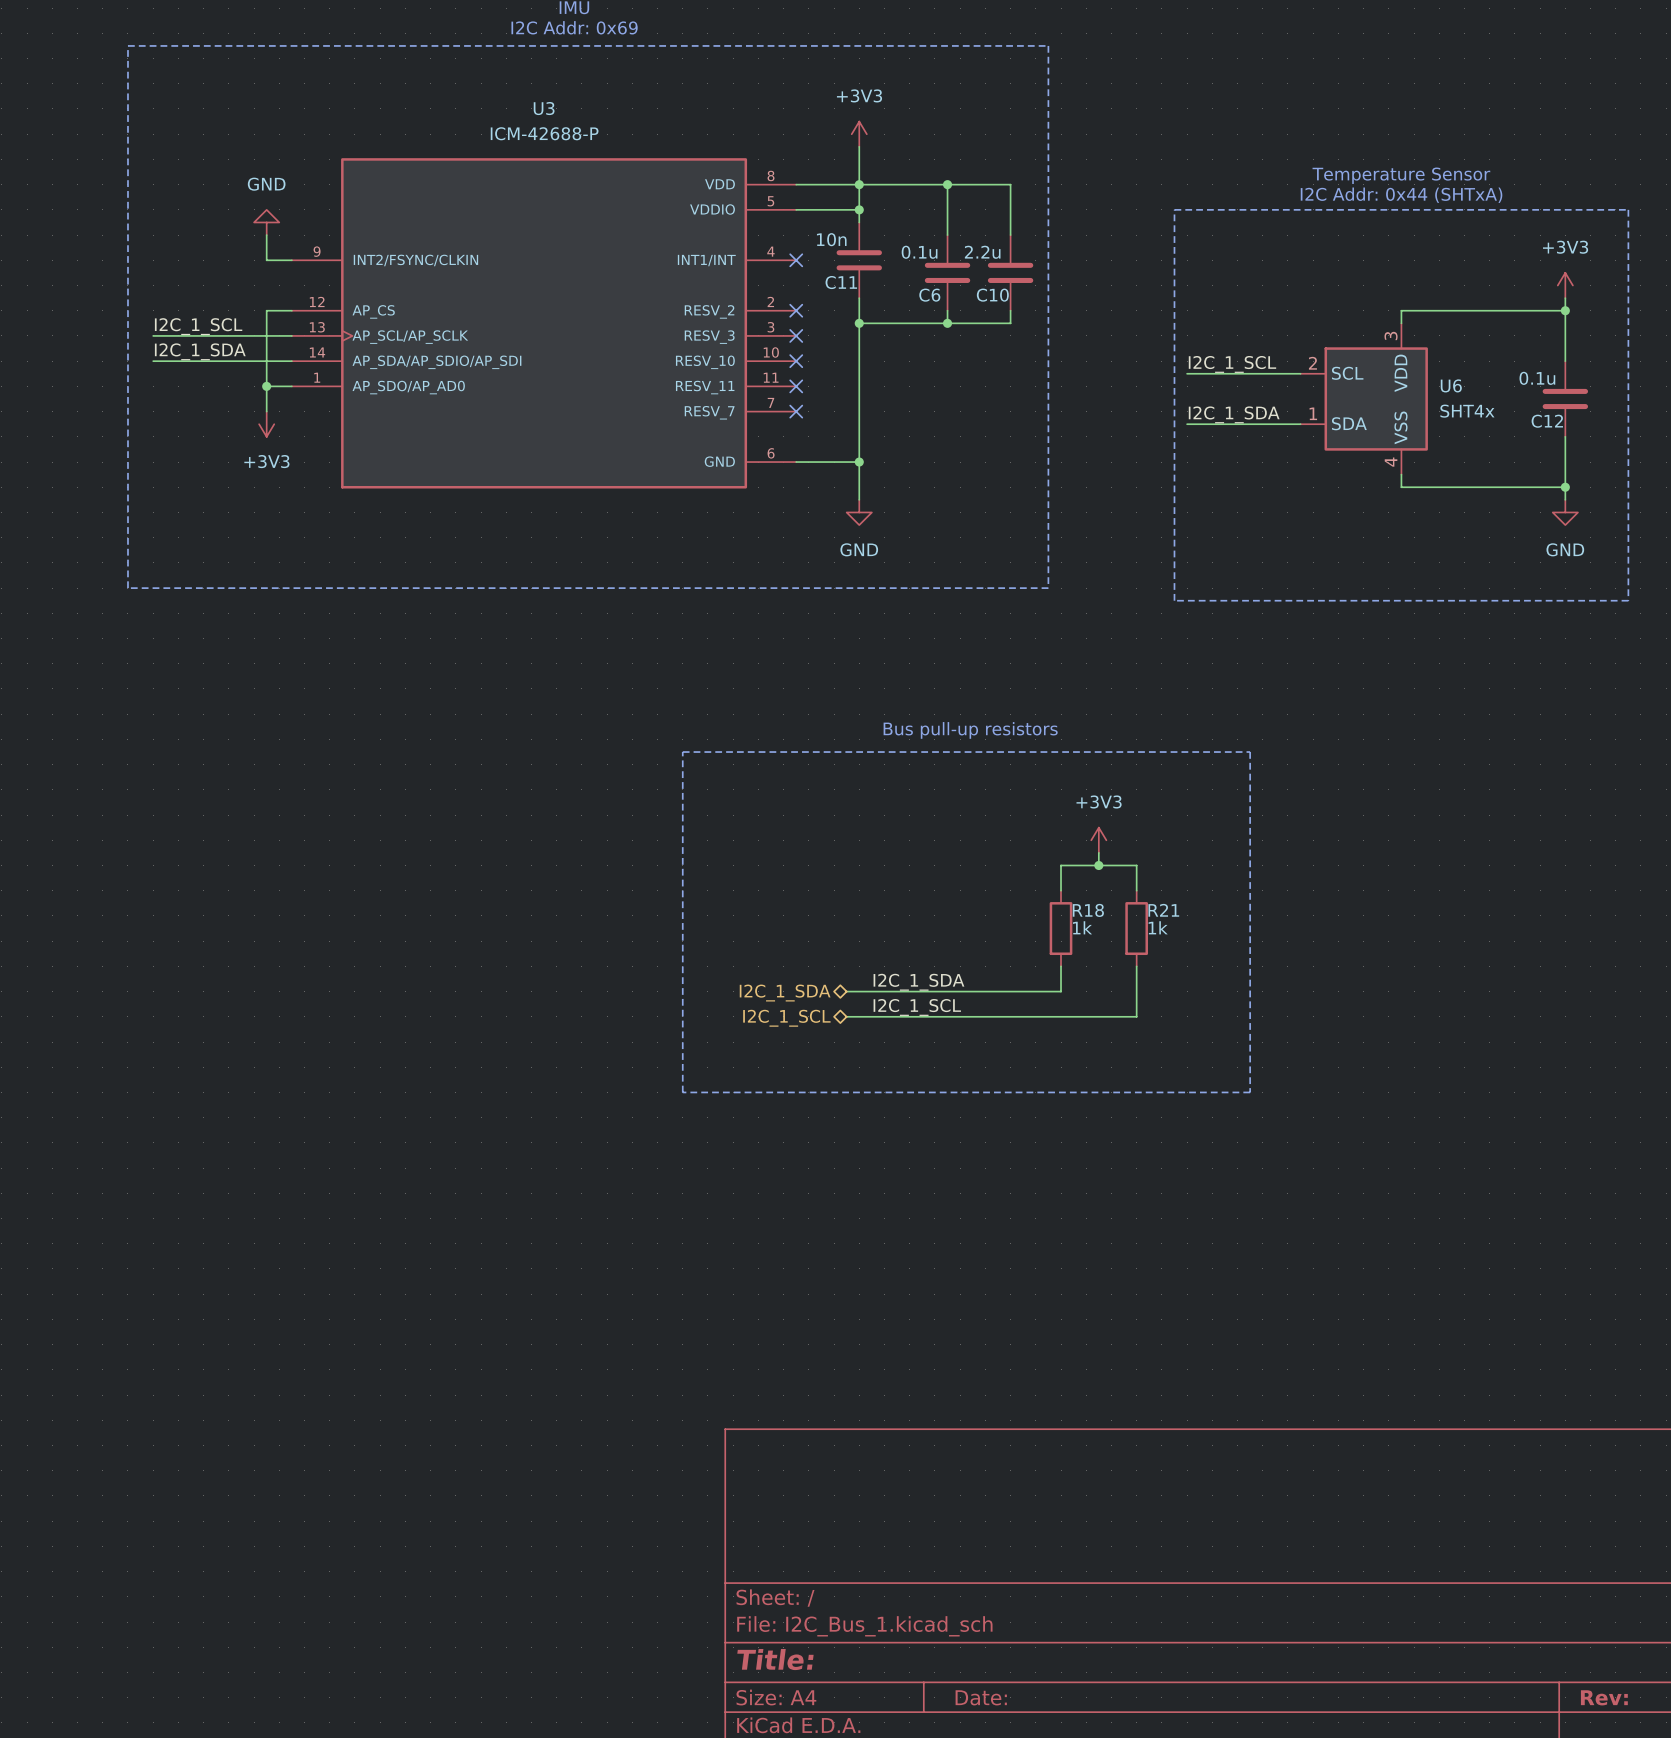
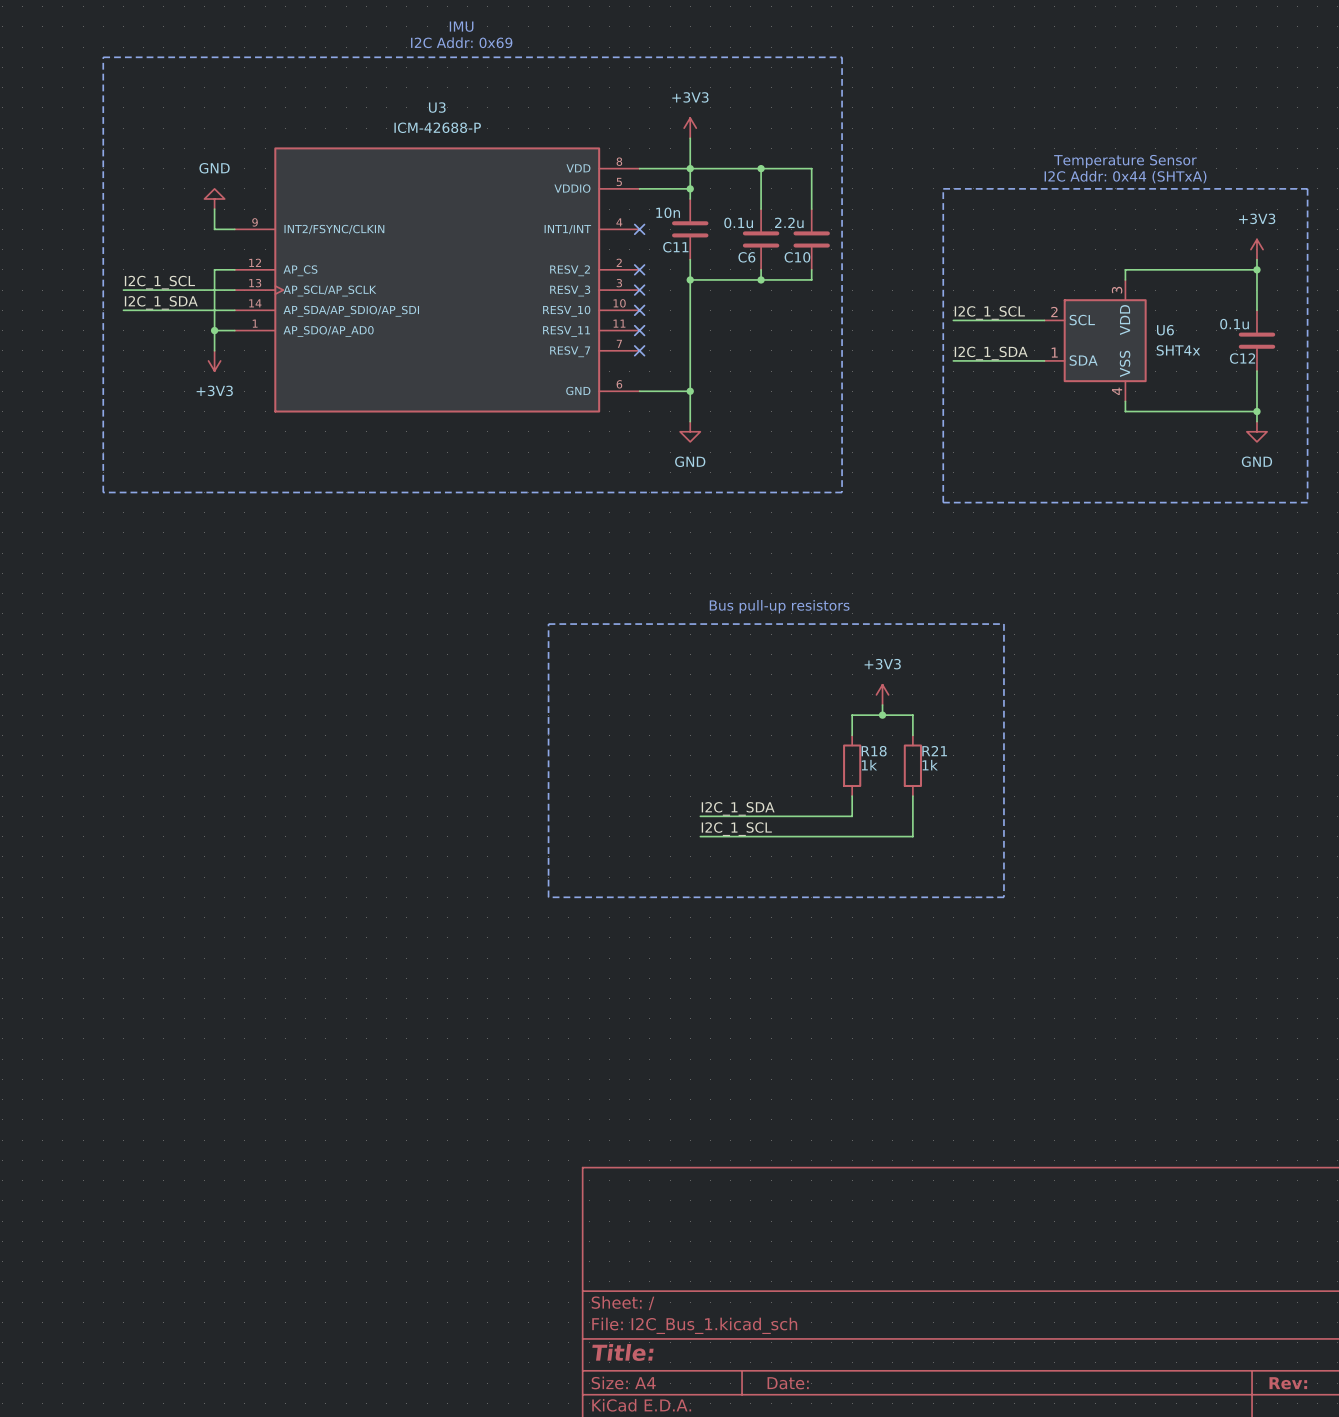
wire: (846, 991) (871, 991) -> none
hierarchical label: I2C_1_SDA (785, 993) -> none
wire: (846, 1016) (871, 1016) -> none
hierarchical label: I2C_1_SCL (786, 1018) -> none

